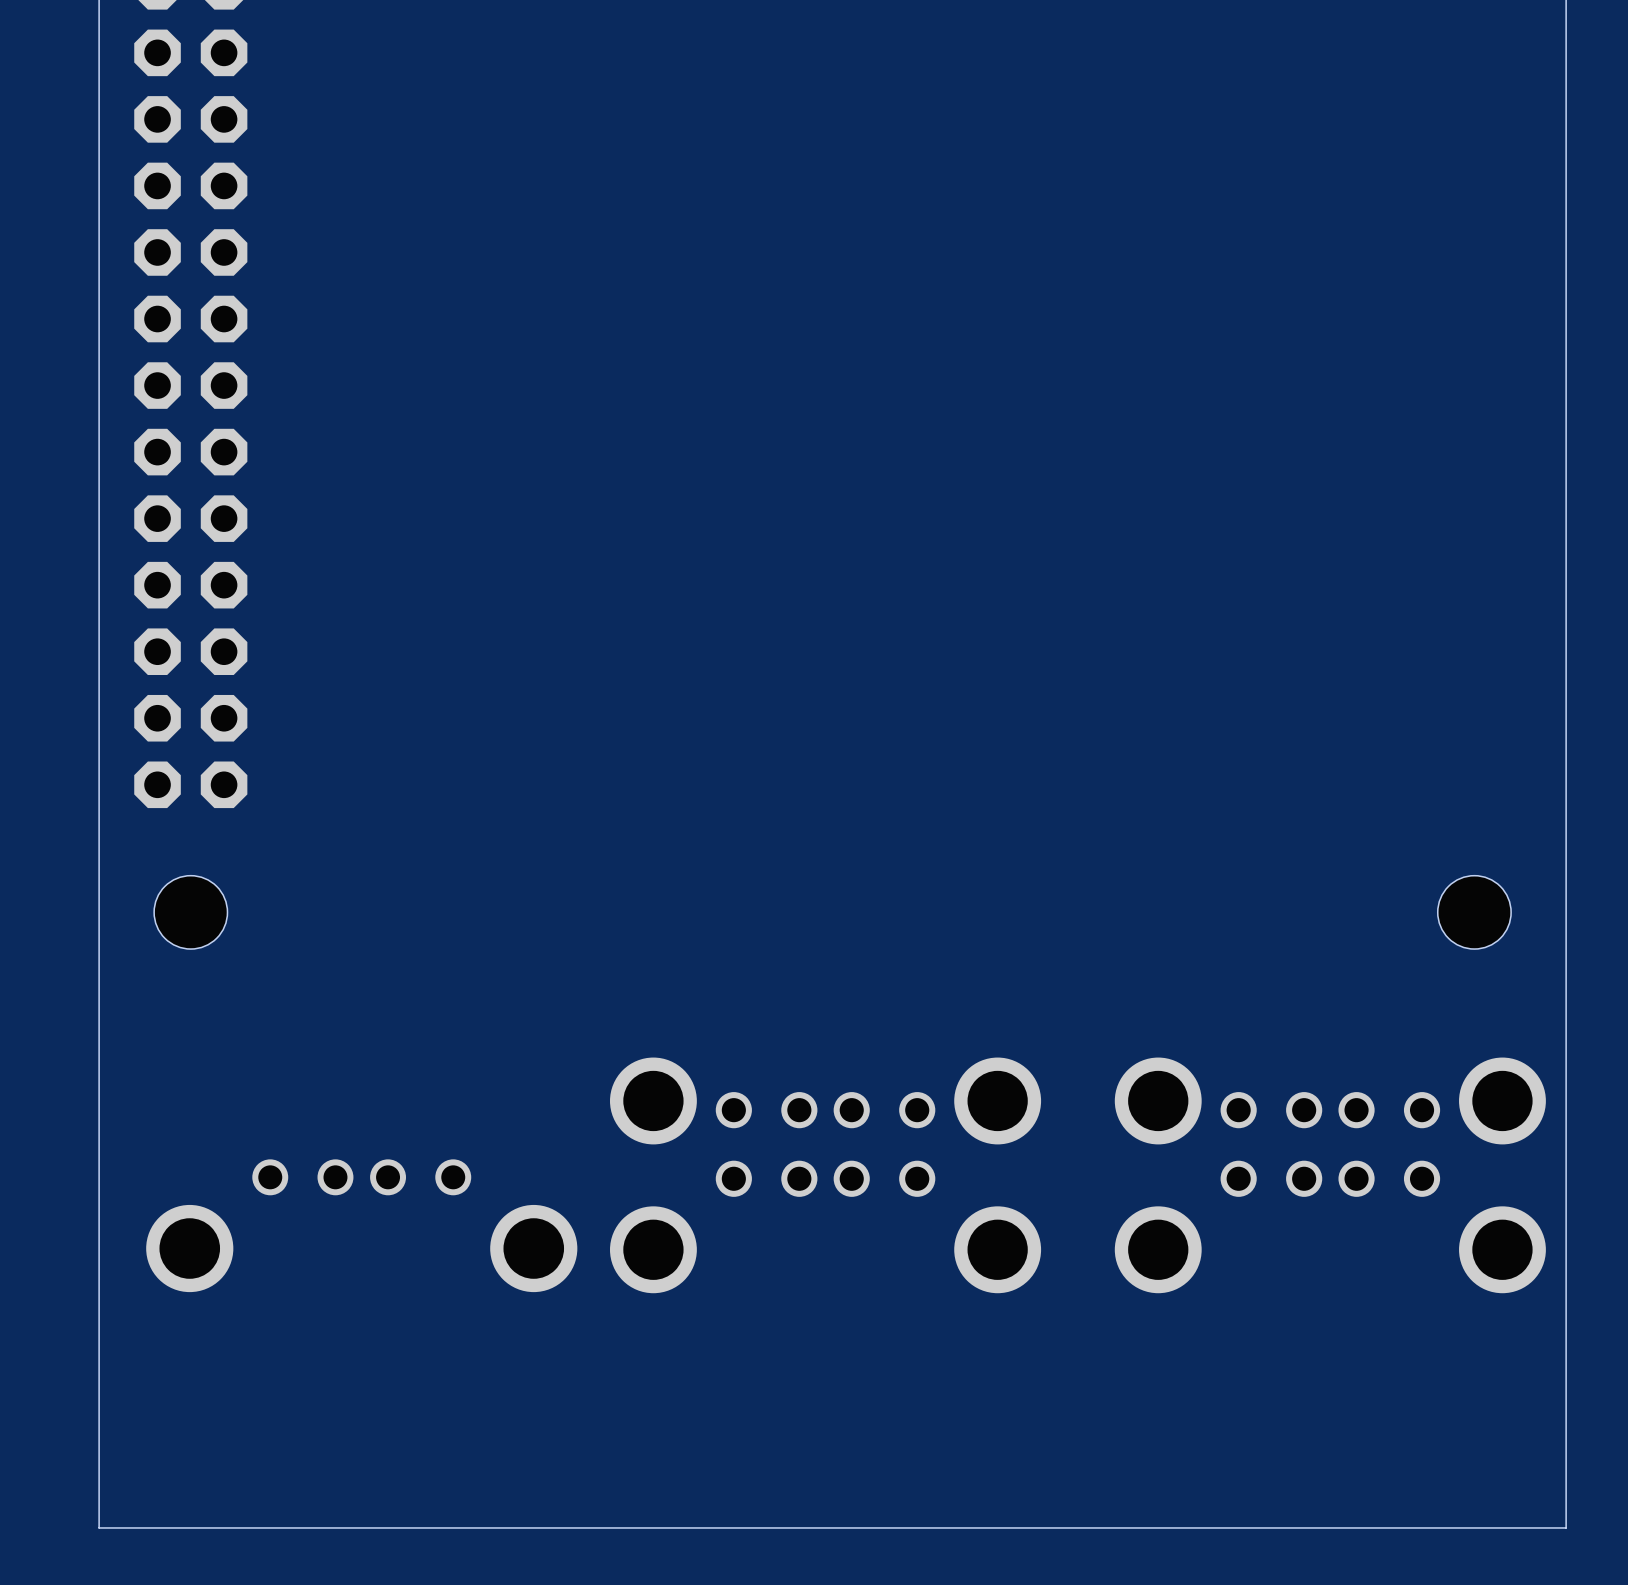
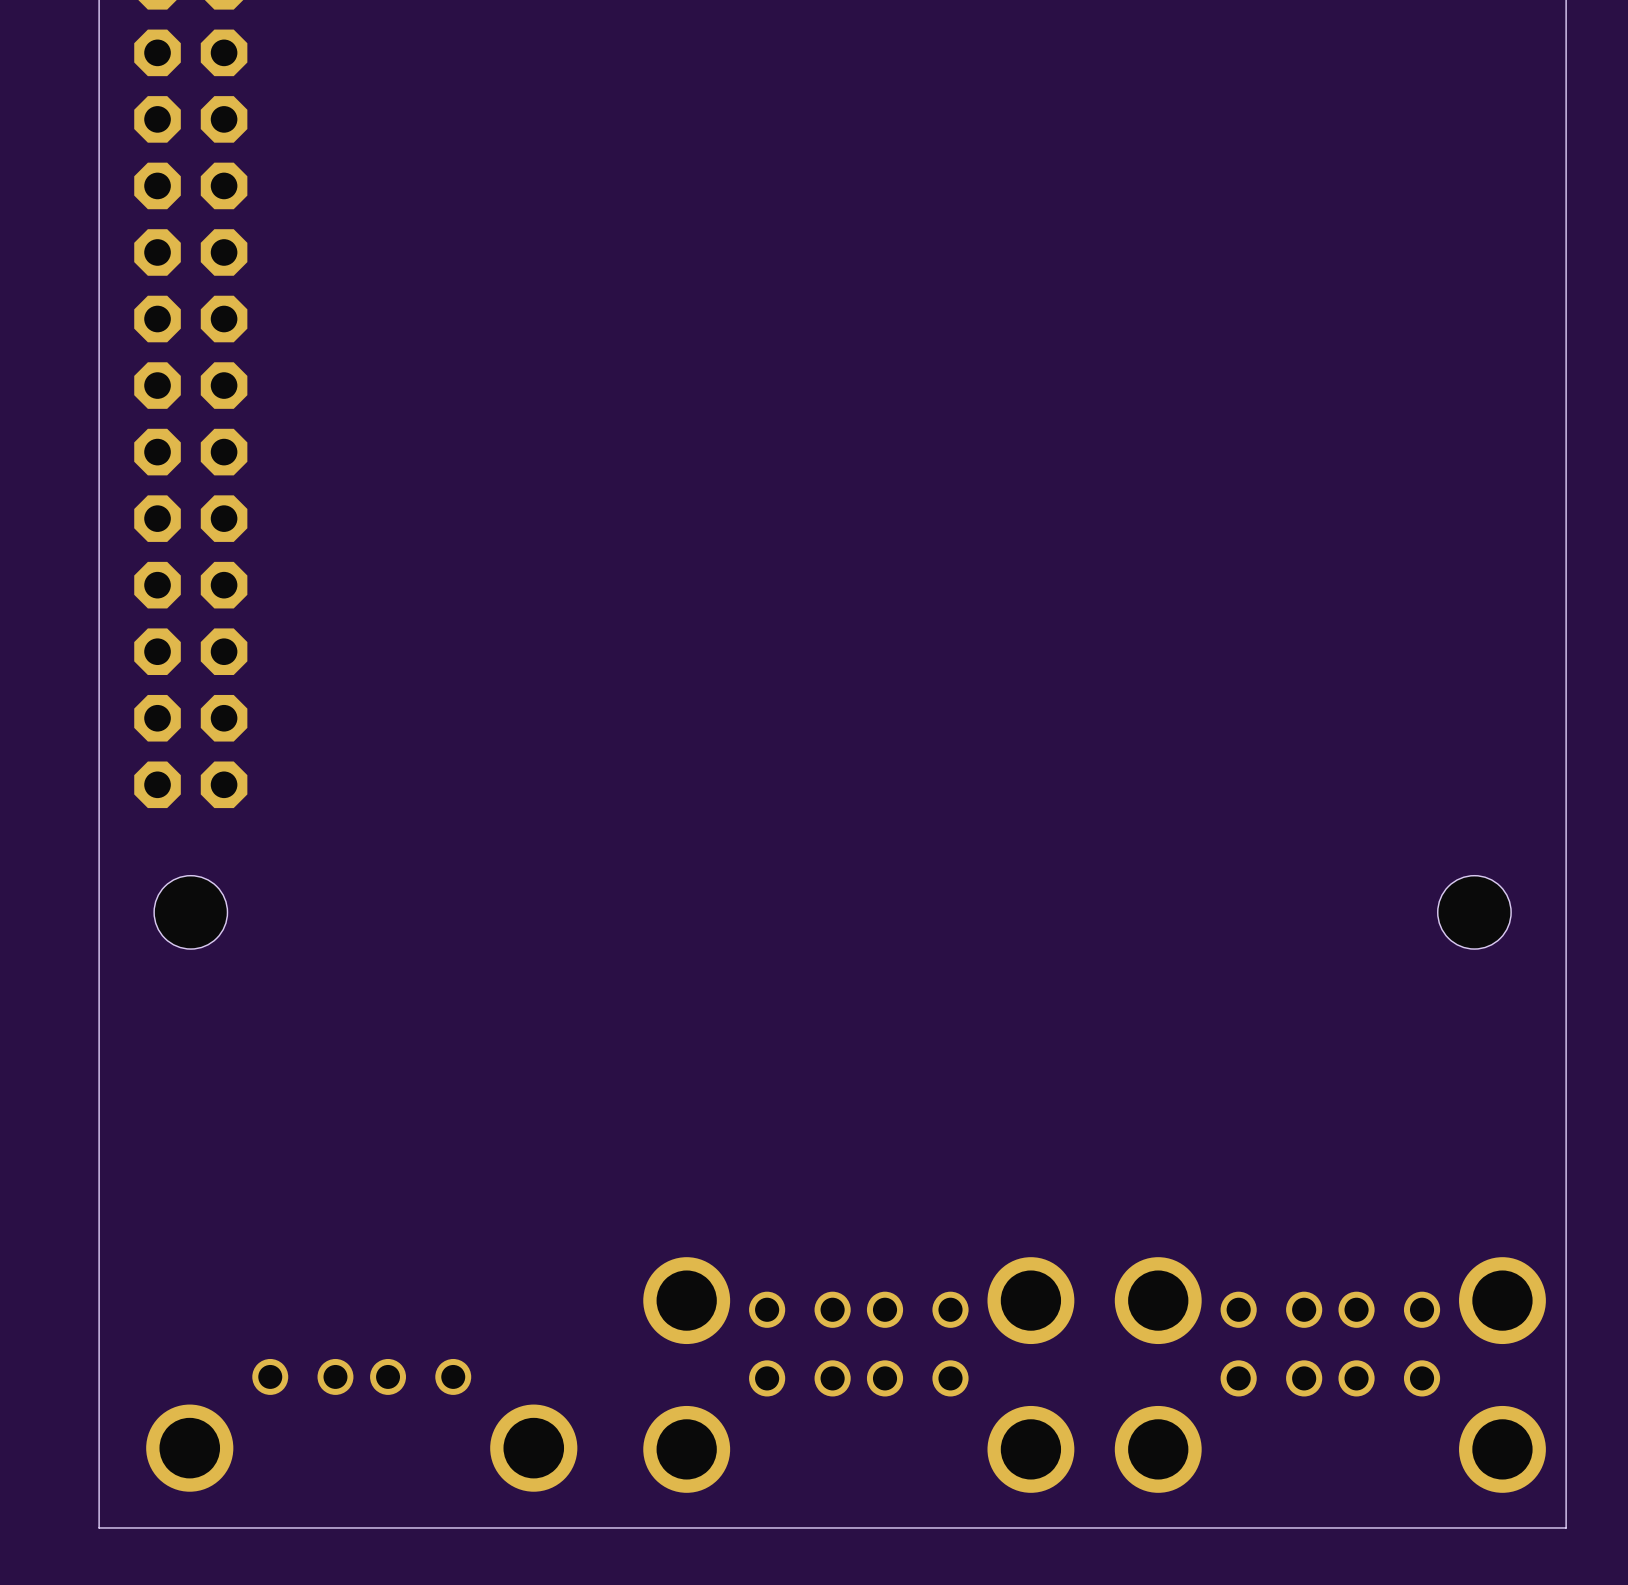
part position: (825, 1175) -> (858, 1374)
part position: (1330, 1175) -> (1330, 1374)
part position: (361, 1225) -> (361, 1425)

